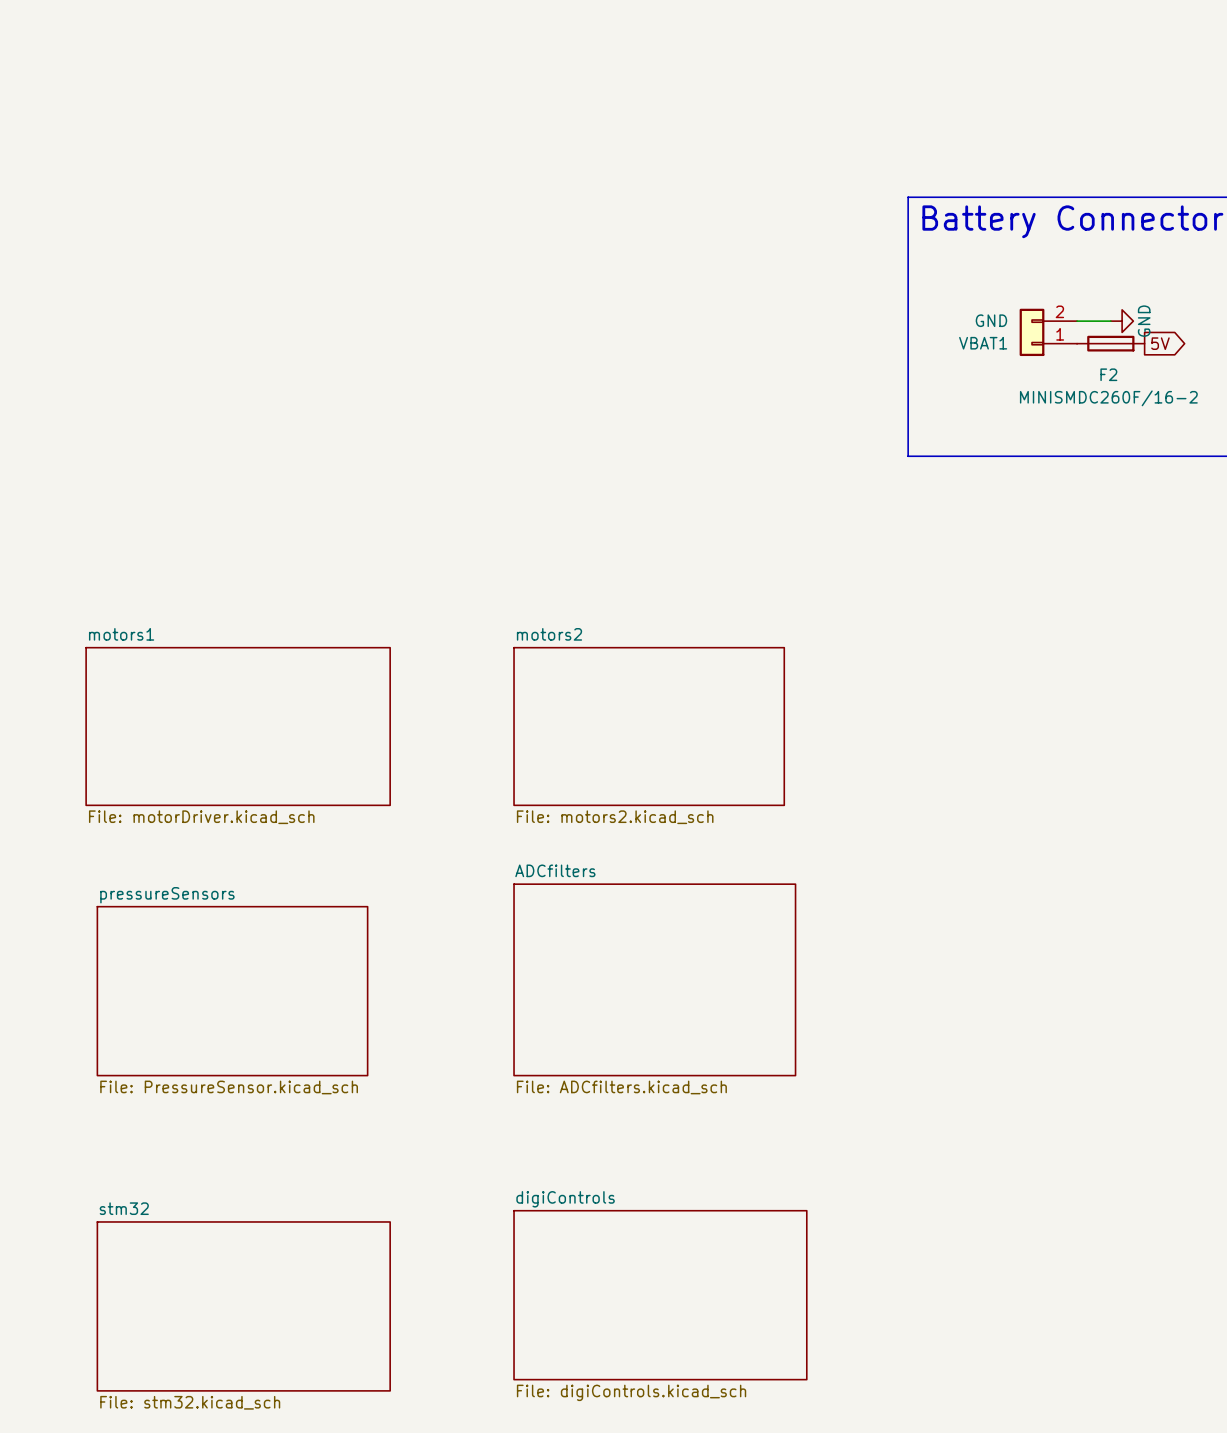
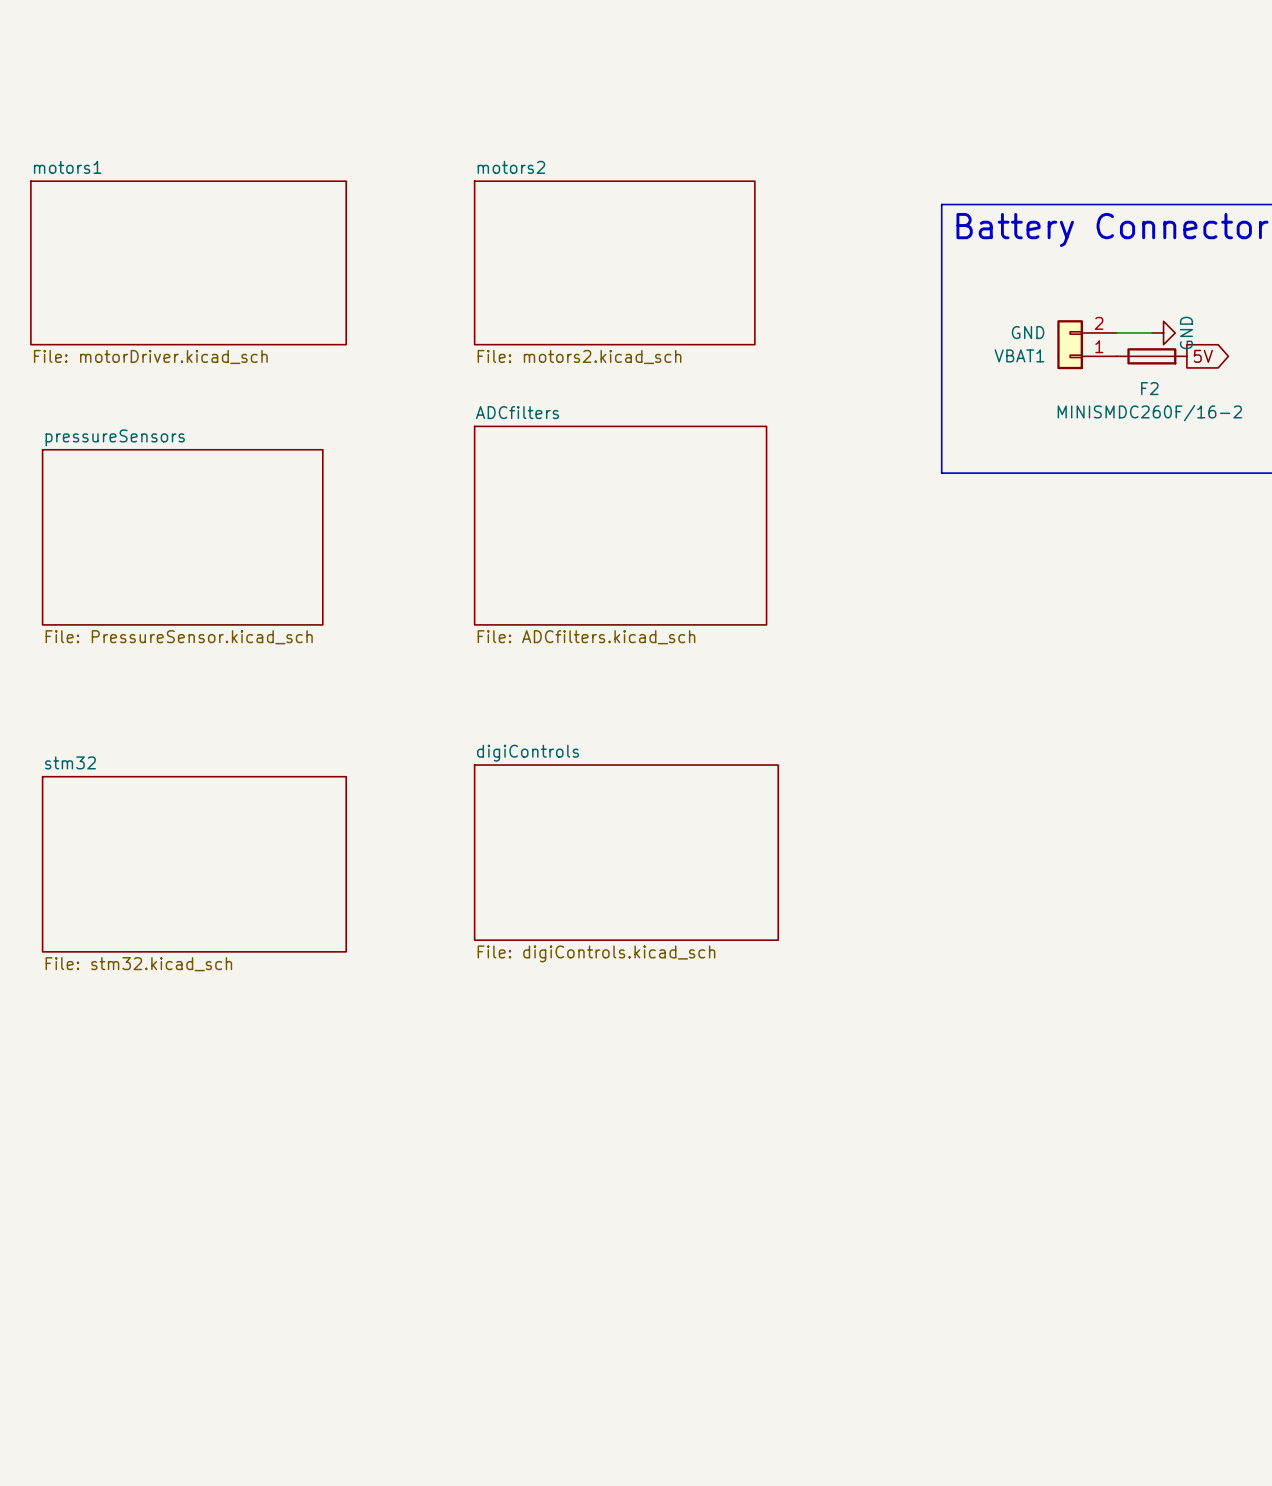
sheet ADCfilters: none -> File: ADCfilters.kicad_sch (620, 525)
sheet pressureSensors: none -> File: PressureSensor.kicad_sch (182, 537)
sheet motors1 position: (238, 726) -> (188, 262)
sheet motors2 position: (649, 726) -> (614, 262)
sheet digiControls: none -> File: digiControls.kicad_sch (626, 852)
sheet ADCfilters: File: ADCfilters.kicad_sch (654, 979) -> none
sheet pressureSensors: File: PressureSensor.kicad_sch (232, 991) -> none
sheet digiControls: File: digiControls.kicad_sch (660, 1295) -> none
sheet stm32 position: (243, 1306) -> (194, 864)

